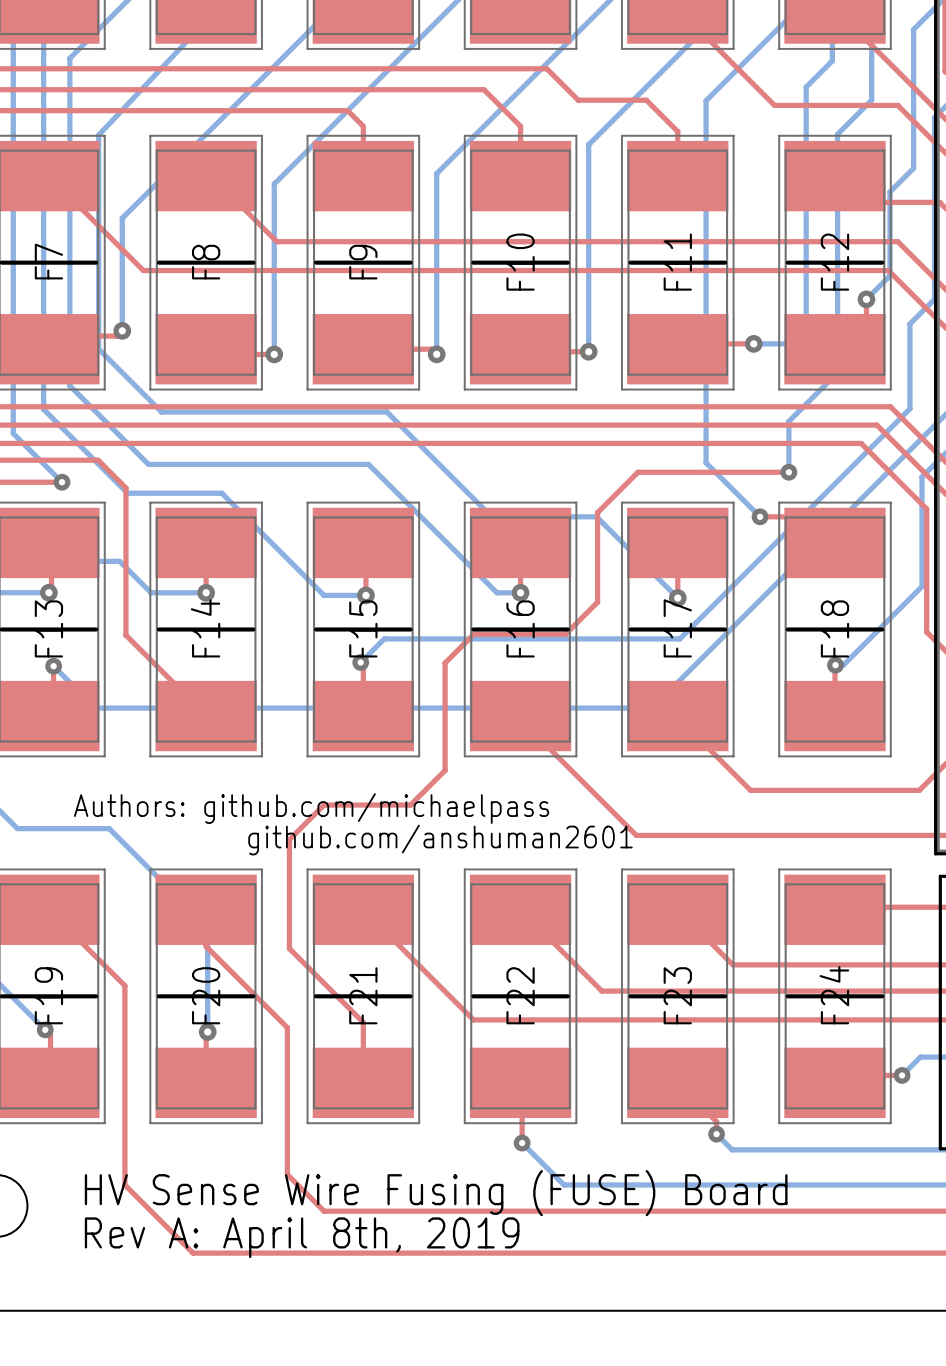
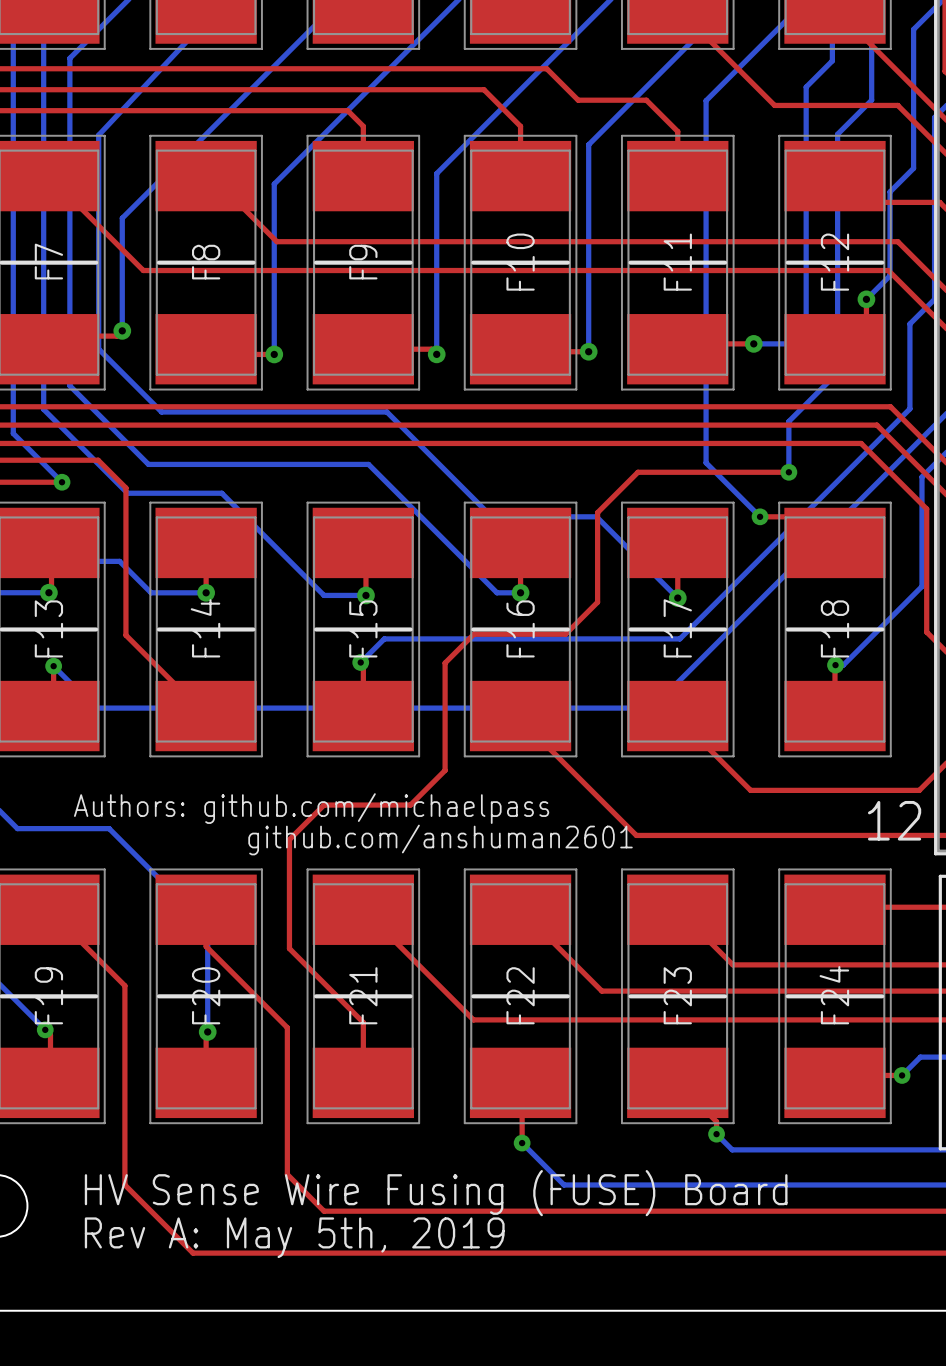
text: none -> 12 (894, 820)
text: Rev A: April 8th, 2019 (302, 1237) -> Rev A: May 5th, 2019 (294, 1237)

